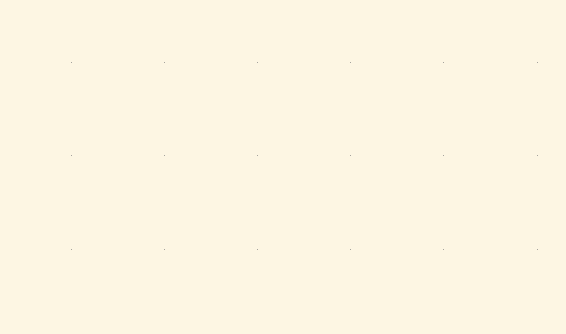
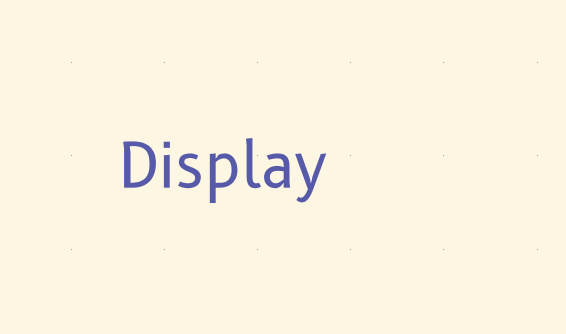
text: none -> Display (224, 170)

